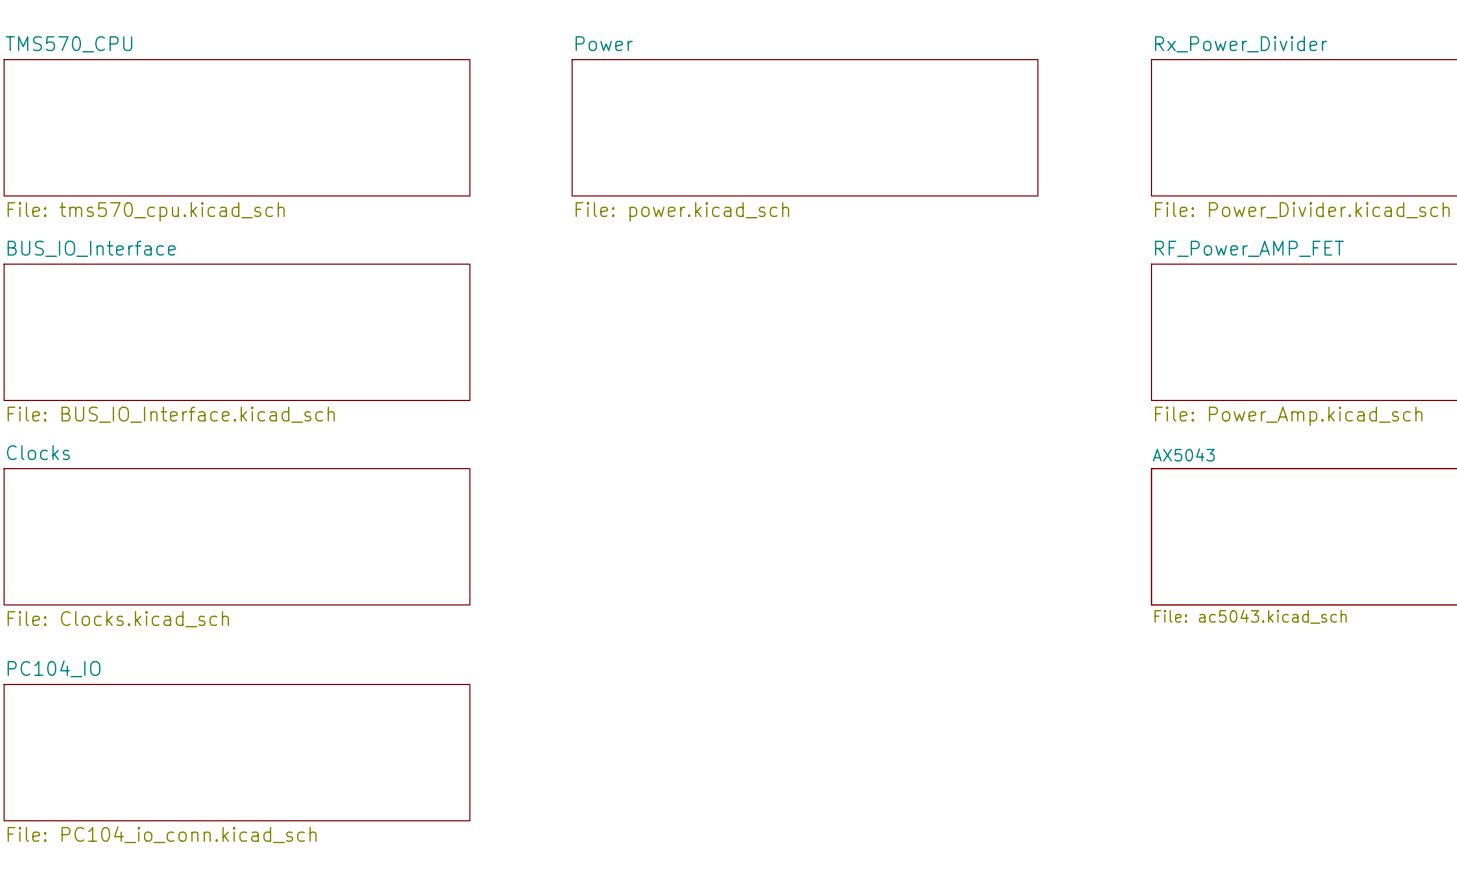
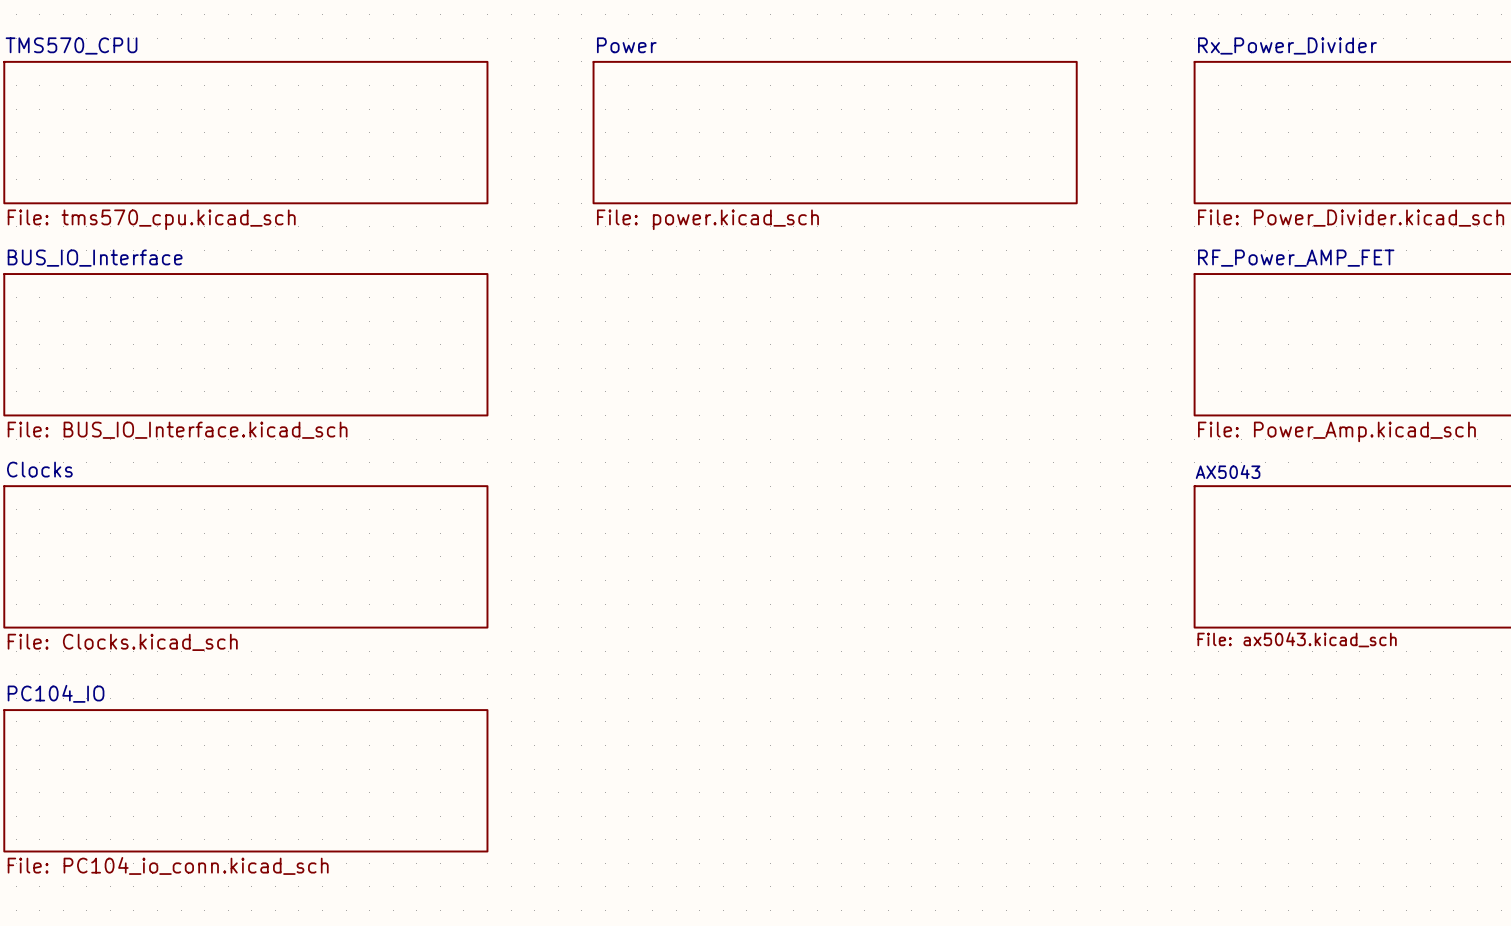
sheet AX5043 value: File: ac5043.kicad_sch (1250, 616) -> File: ax5043.kicad_sch (1297, 639)

